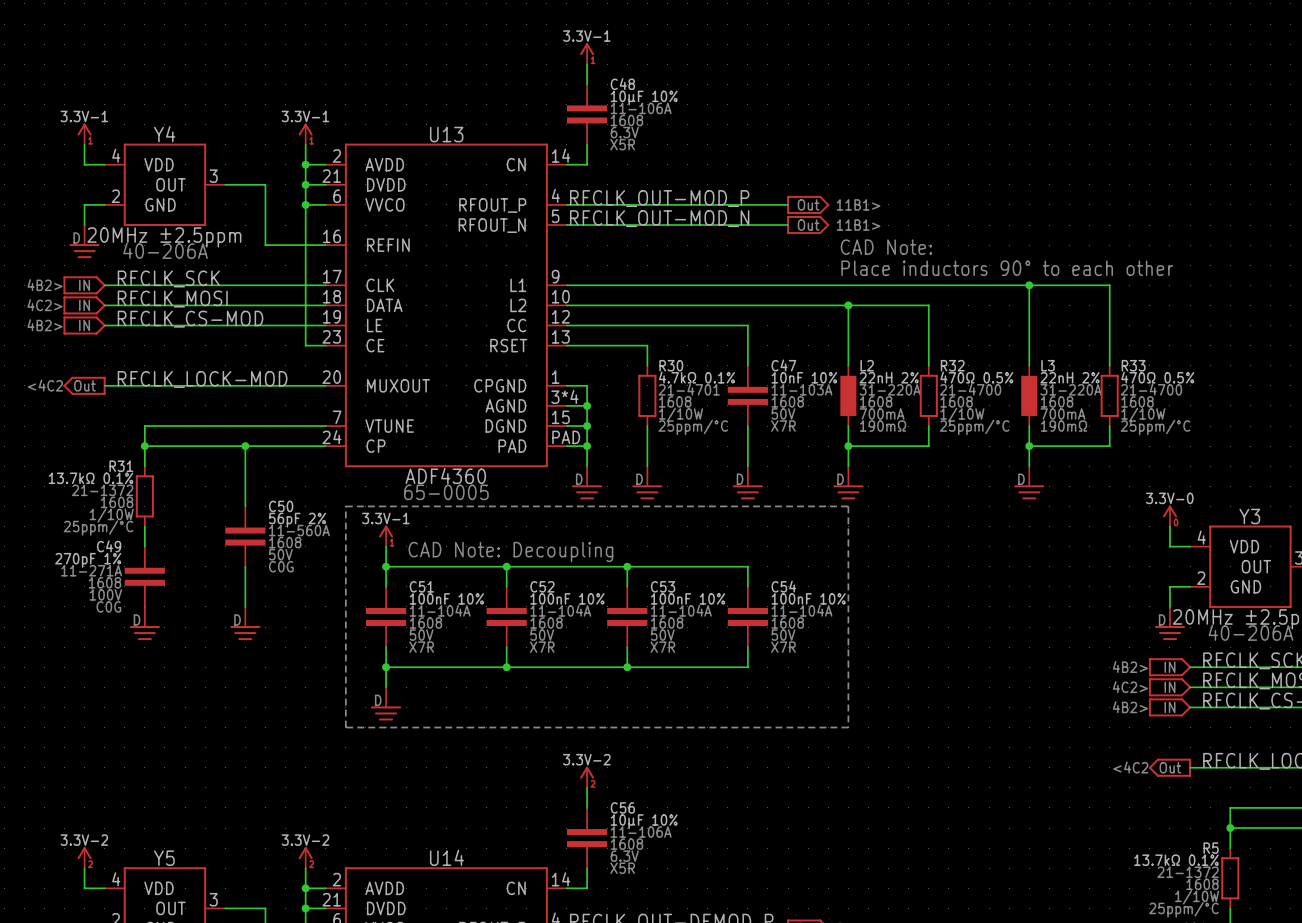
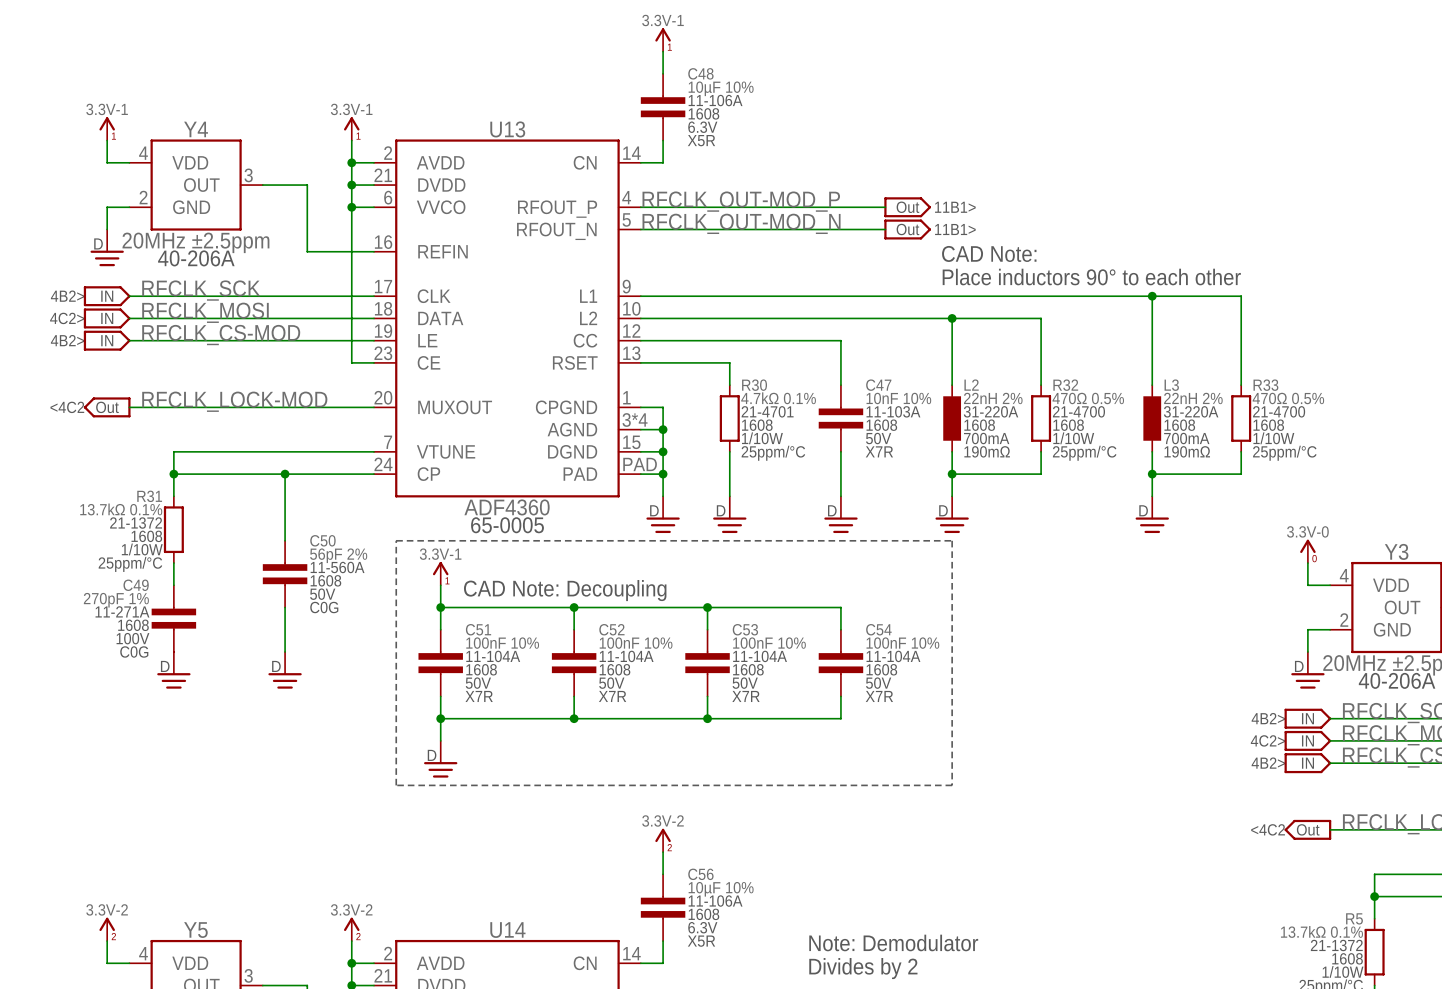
text: none -> Note: Demodulator (893, 942)
text: none -> Divides by 2 (863, 968)

